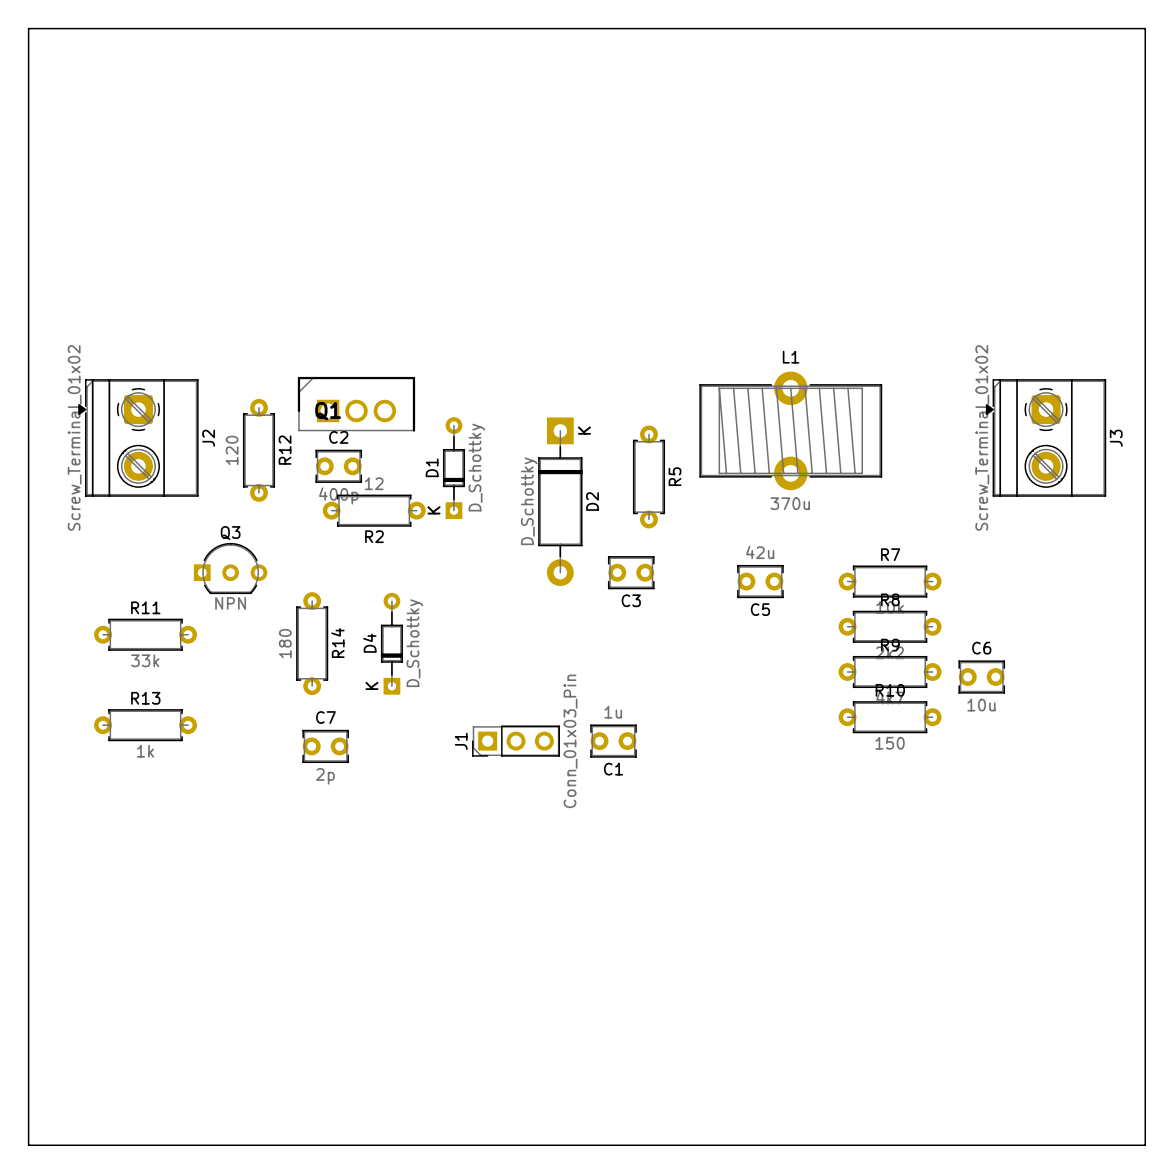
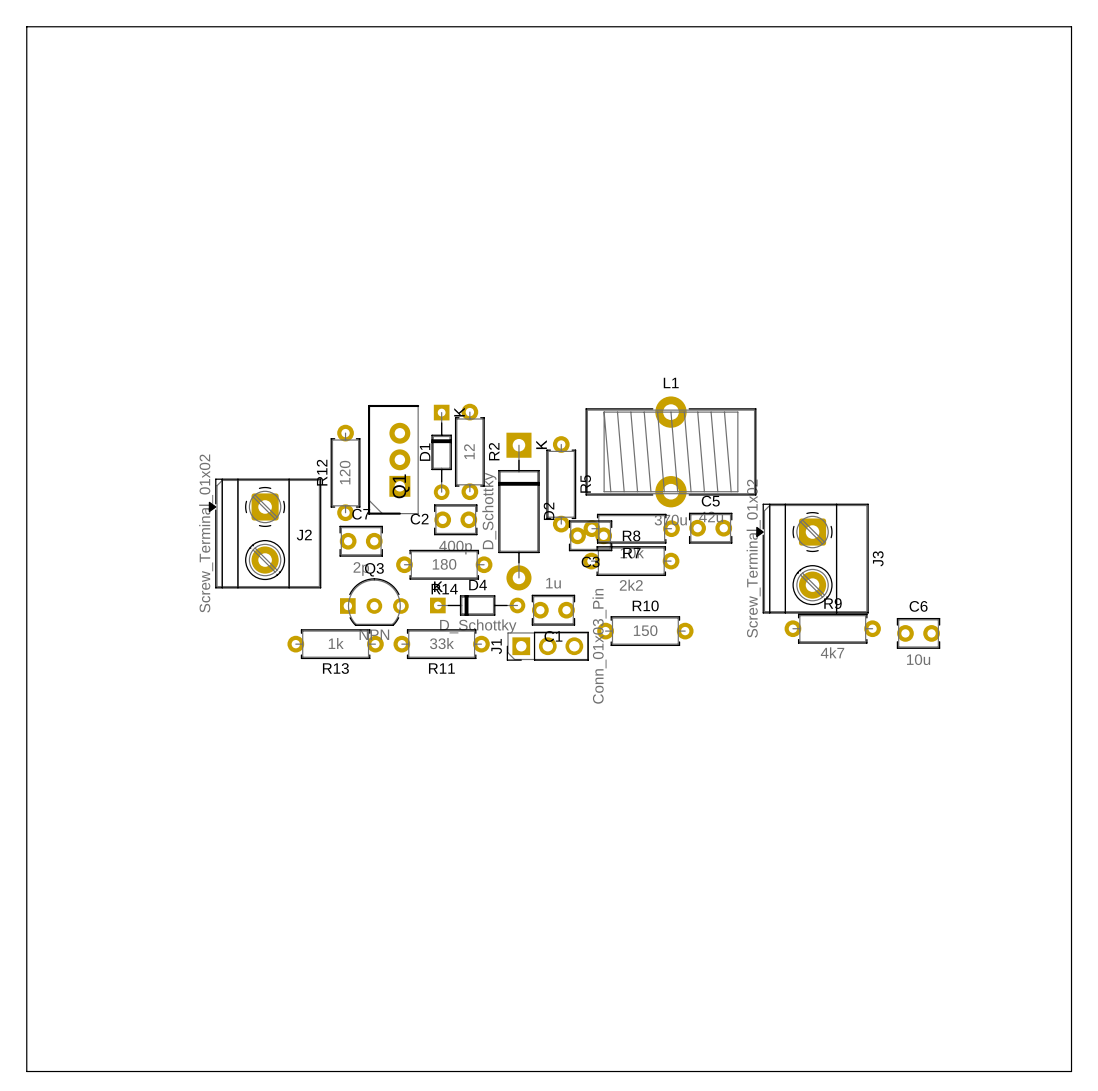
Q1 footprint: [297, 376, 416, 432] -> [368, 404, 420, 515]
Q1 name position: Q1 (328, 411) -> Q1 (401, 486)
L1 position: (790, 430) -> (670, 451)
J2 position: (138, 437) -> (265, 533)
C2 name position: C2 (338, 437) -> C2 (419, 519)
J3 position: (1046, 437) -> (812, 558)
J2 name rotation: 0° (208, 438) -> 90° clockwise (304, 535)
J2 name position: J2 (208, 438) -> J2 (304, 535)
R12 value position: 120 (232, 450) -> 120 (345, 472)
R12 position: (258, 450) -> (345, 472)
R12 name position: R12 (285, 450) -> R12 (322, 472)
C2 position: (338, 466) -> (455, 519)
D1 value: D_Schottky (476, 467) -> none
D1 rotation: 0° (453, 468) -> 180° (441, 452)
R5 position: (648, 476) -> (561, 484)
R2 value position: 12 (374, 483) -> 12 (469, 451)
D2 position: (560, 501) -> (518, 511)
R2 rotation: 0° (374, 510) -> 90° clockwise (469, 451)
R2 position: (374, 510) -> (469, 451)
R2 name position: R2 (374, 536) -> R2 (494, 451)
R7 name position: R7 (890, 554) -> R7 (631, 553)
Q3 position: (230, 568) -> (374, 602)
C5 position: (760, 581) -> (710, 528)
R7 position: (890, 581) -> (631, 528)
R11 name position: R11 (145, 607) -> R11 (441, 668)
C5 name position: C5 (760, 609) -> C5 (710, 501)
R8 position: (890, 626) -> (631, 561)
R11 position: (145, 634) -> (441, 644)
R14 value position: 180 (285, 643) -> 180 (444, 564)
R14 rotation: 0° (312, 643) -> 90° clockwise (444, 564)
R14 position: (312, 643) -> (444, 564)
D4 rotation: 0° (391, 643) -> 90° clockwise (477, 605)
D4 position: (391, 643) -> (477, 605)
R11 value position: 33k (145, 660) -> 33k (441, 643)
R13 name position: R13 (145, 698) -> R13 (335, 668)
R10 position: (890, 717) -> (645, 631)
R13 position: (145, 725) -> (335, 644)
J1 position: (516, 741) -> (547, 646)
C1 position: (613, 741) -> (553, 610)
R10 value position: 150 (890, 743) -> 150 (645, 630)
C7 position: (325, 746) -> (361, 541)
R13 value position: 1k (145, 751) -> 1k (336, 643)

